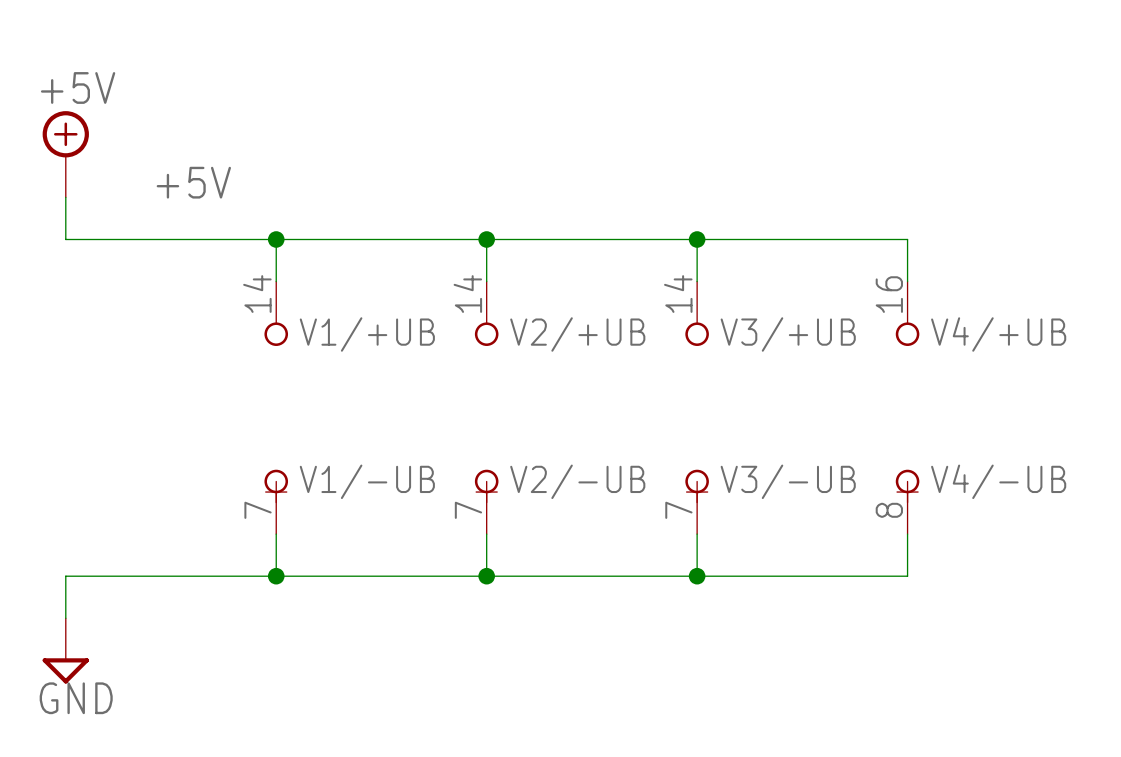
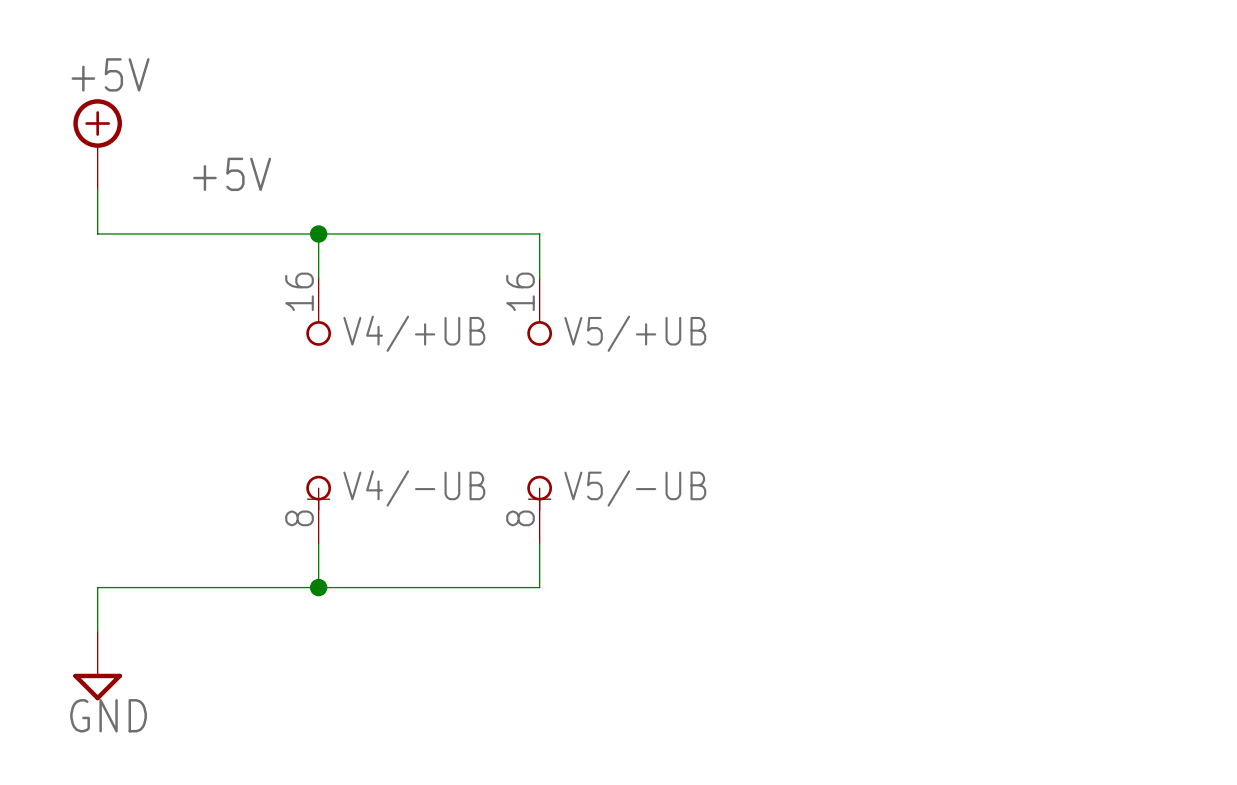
wire: (486, 239) (907, 239) (907, 281) -> none
junction: (486, 239) -> none
wire: (697, 239) (697, 281) -> none
junction: (697, 239) -> none
V2/+UB pin number: 14 (467, 294) -> 16 (520, 291)
V1/+UB: (276, 313) -> none
V3/+UB: (697, 313) -> none
V4/+UB position: (907, 313) -> (318, 312)
V2/+UB name: V2/+UB (577, 334) -> V5/+UB (635, 333)
V2/-UB name: V2/-UB (577, 481) -> V5/-UB (635, 488)
V1/-UB: (276, 501) -> none
V3/-UB: (697, 501) -> none
V4/-UB position: (907, 501) -> (318, 509)
V2/-UB pin number: 7 (468, 510) -> 8 (520, 518)
wire: (697, 534) (697, 576) -> none
wire: (907, 534) (907, 576) (486, 576) -> none
junction: (486, 576) -> none
junction: (697, 576) -> none

